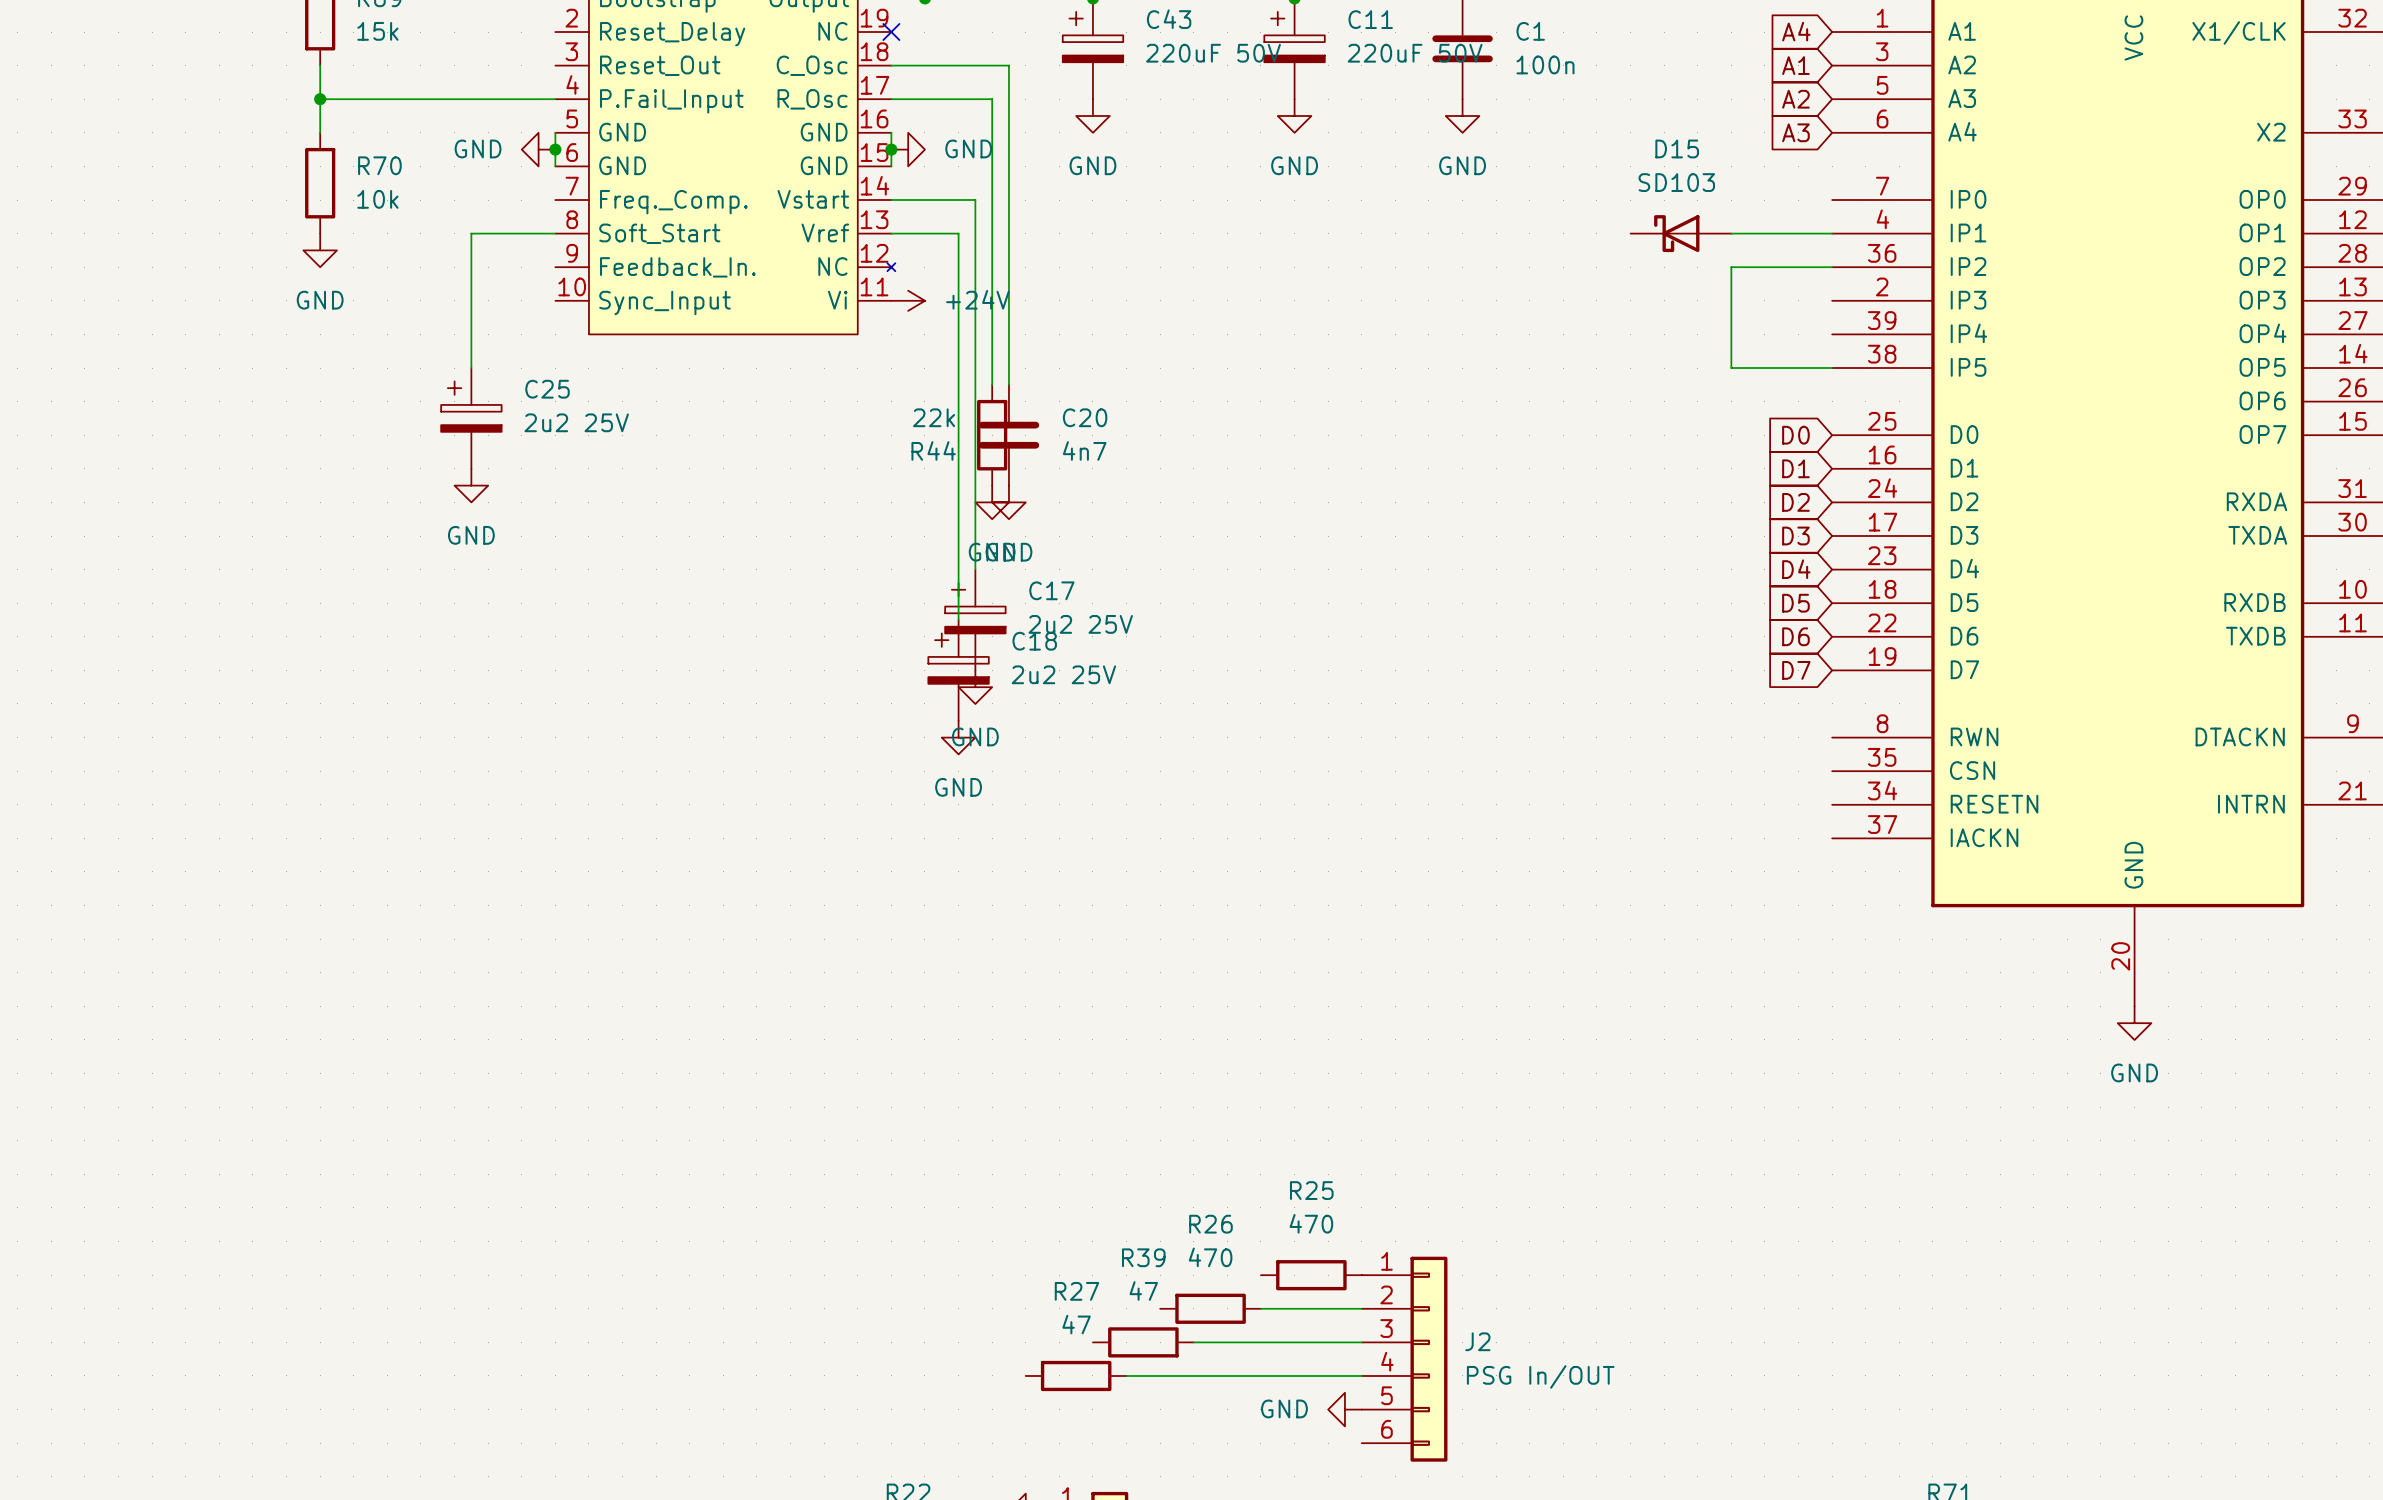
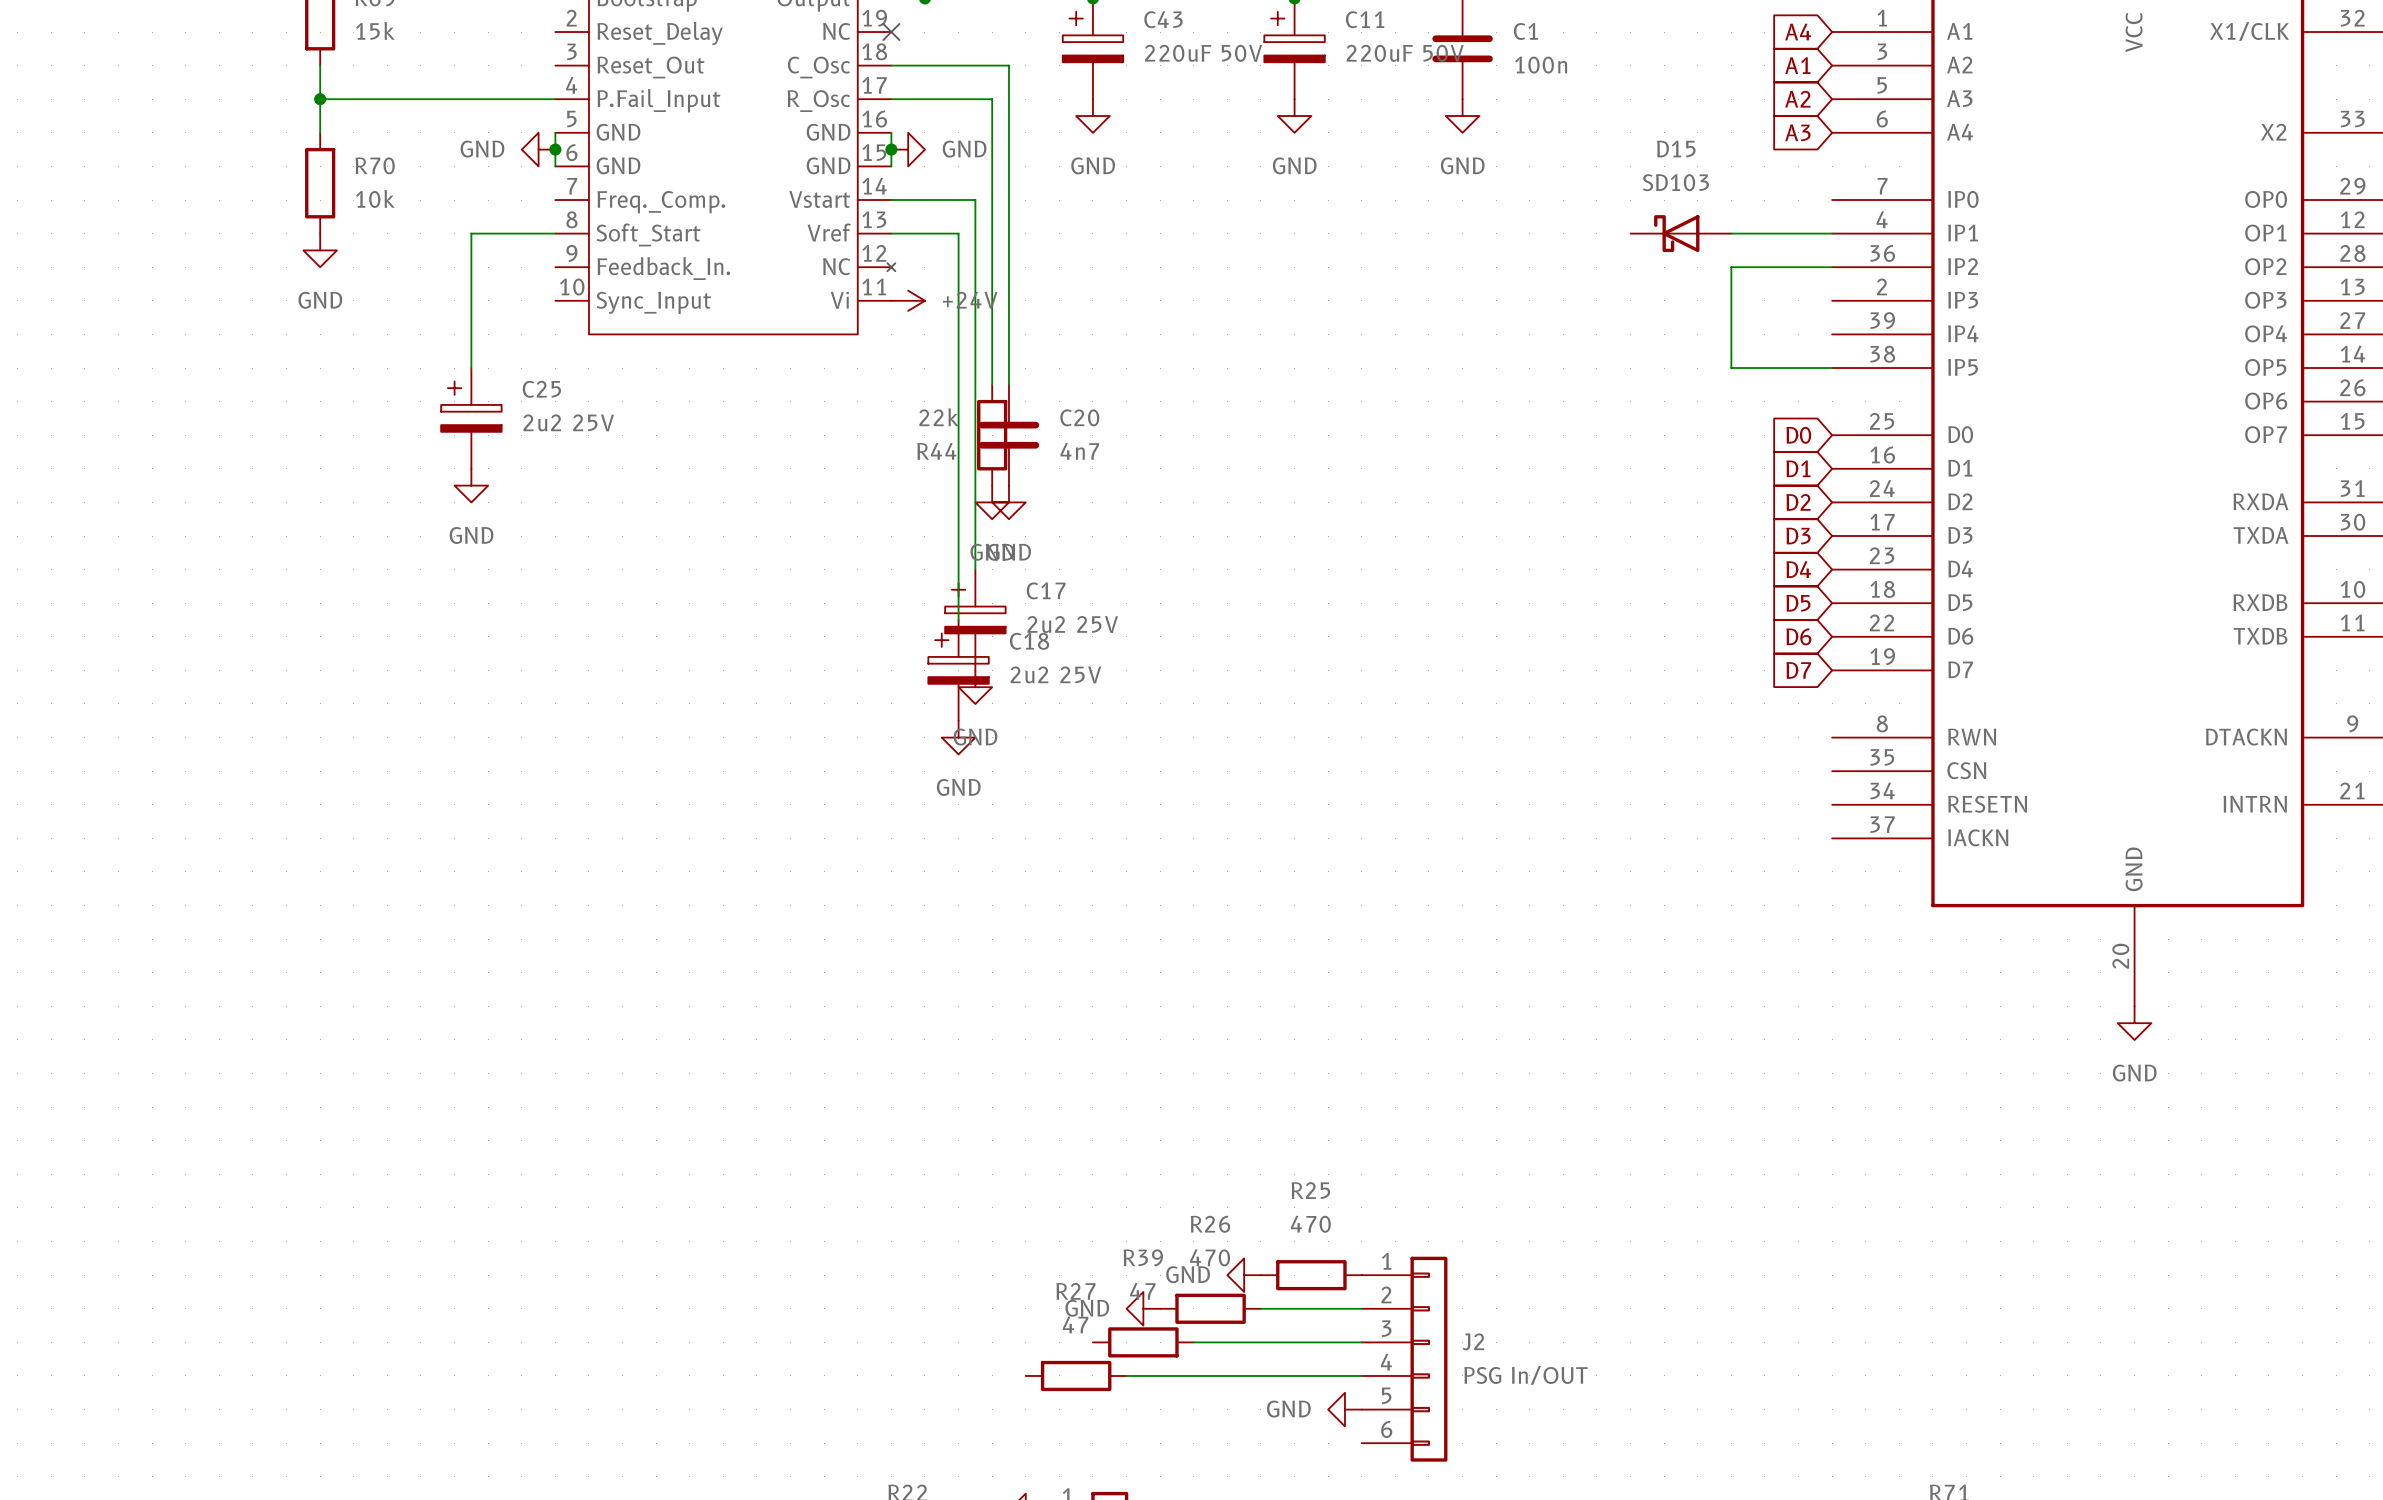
power symbol: none -> GND (1244, 1275)
power symbol: none -> GND (1143, 1308)

